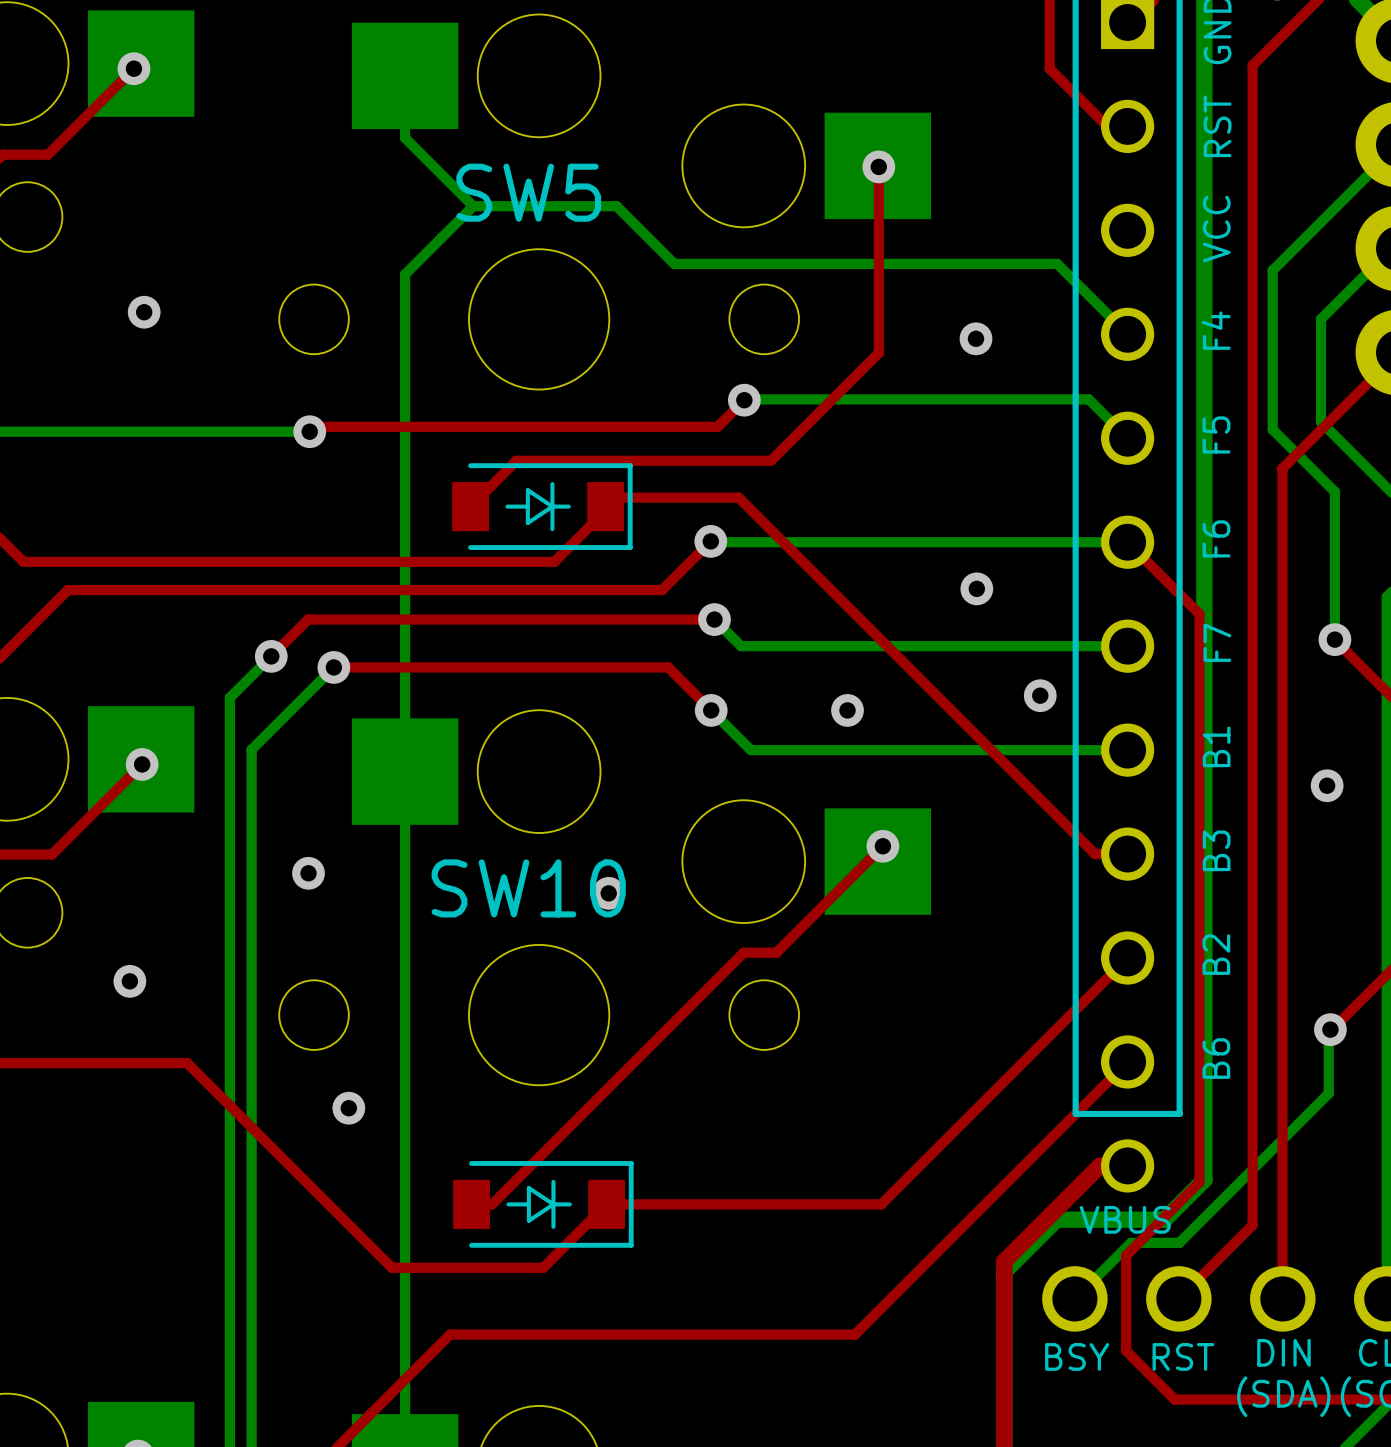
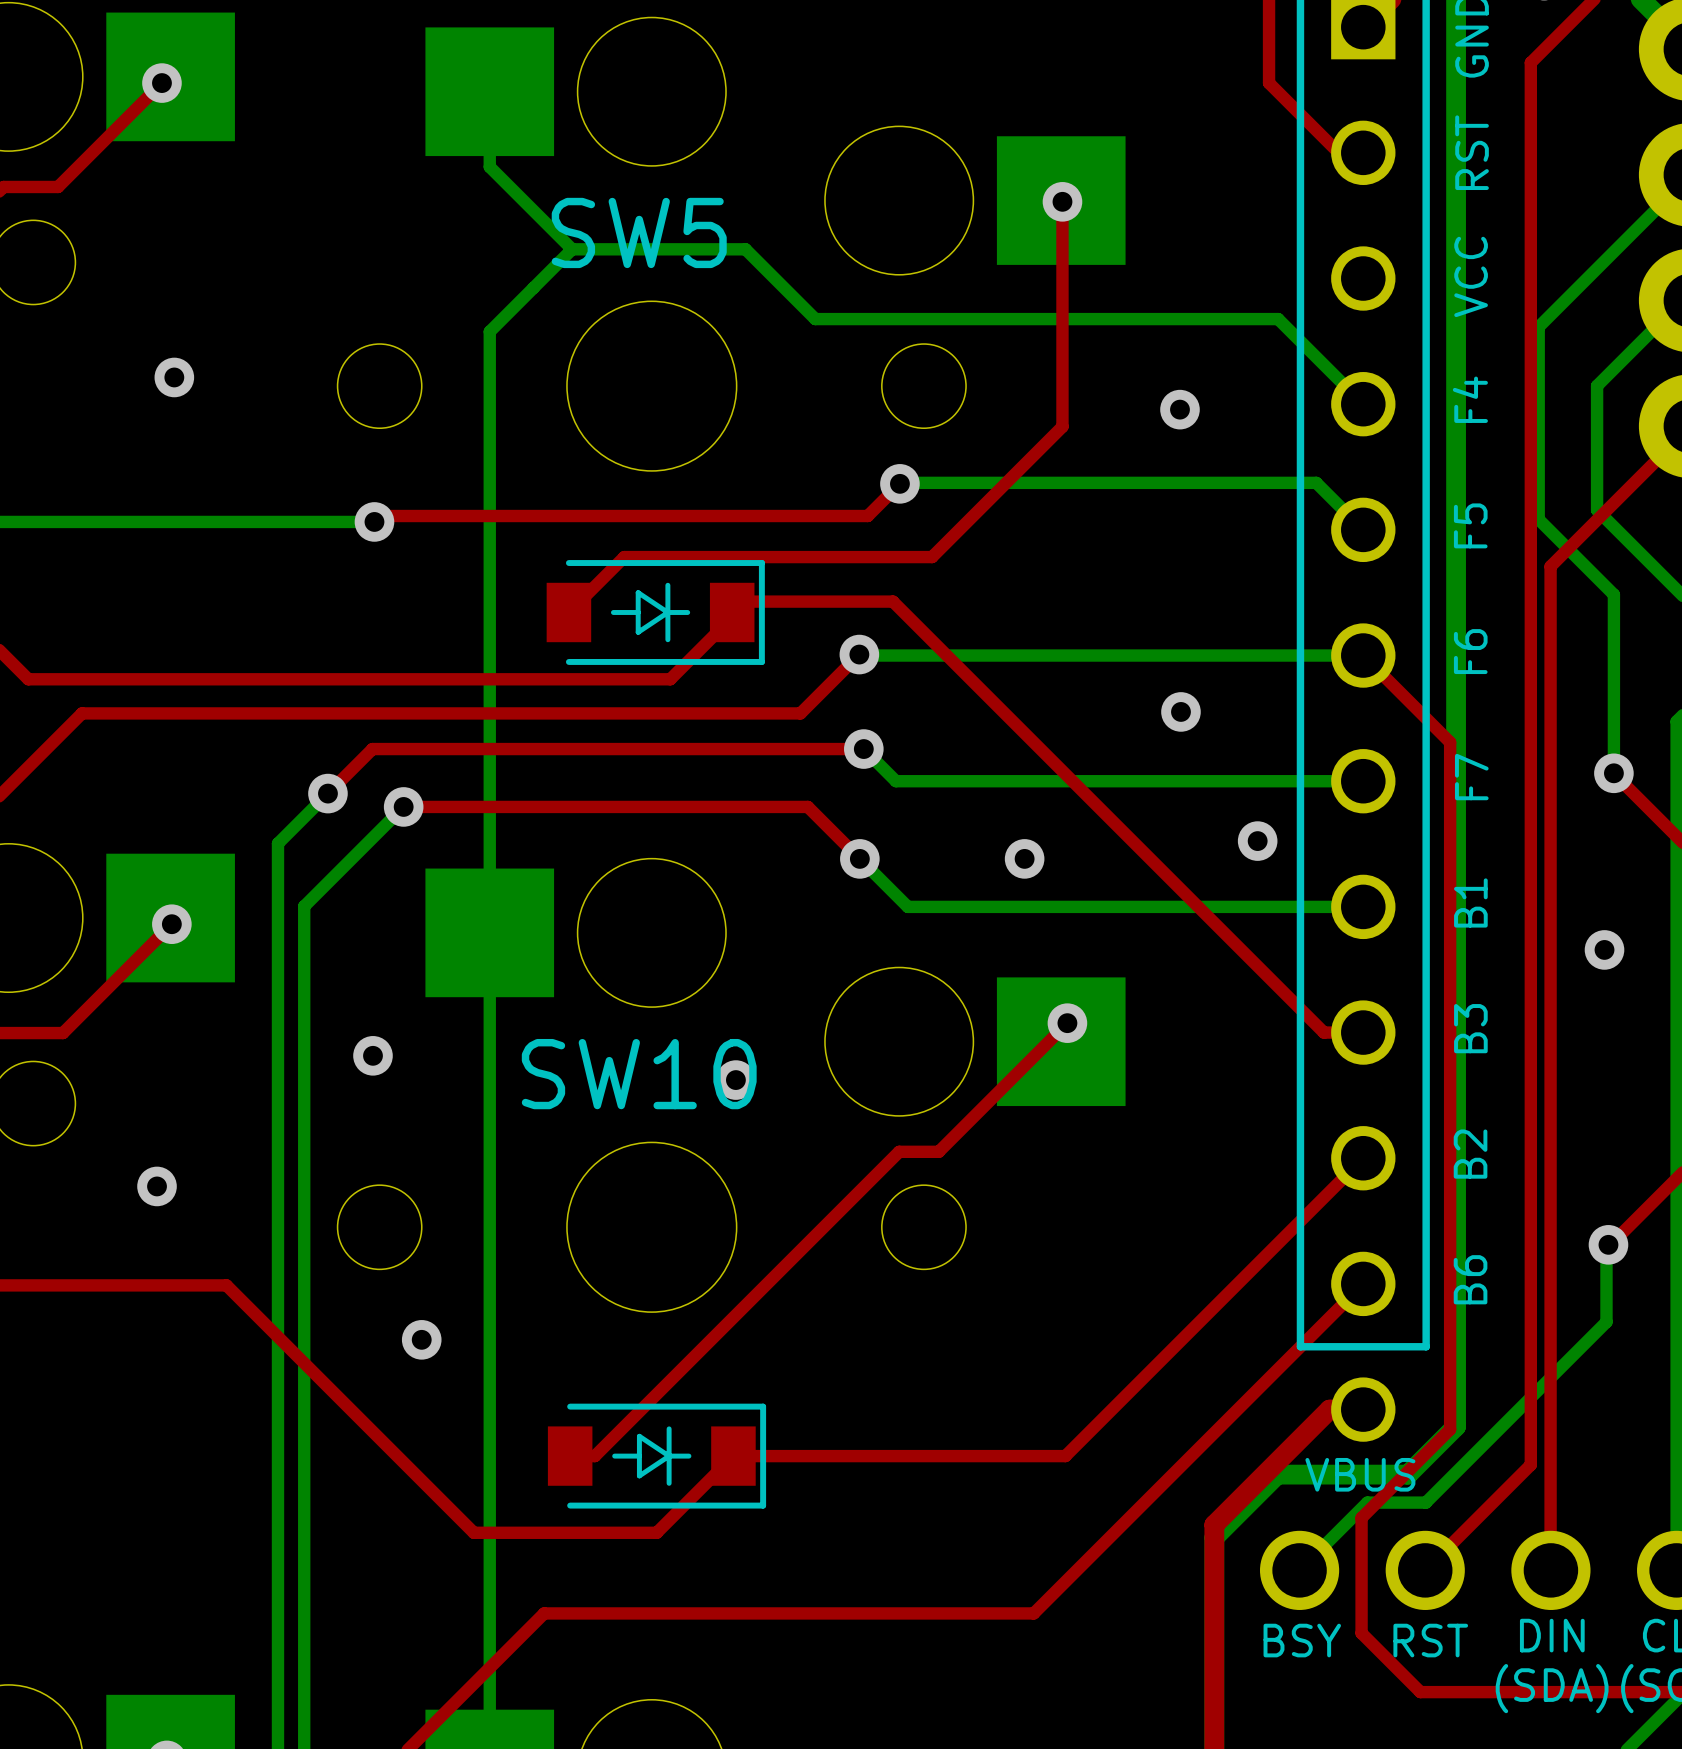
top track: (1266, 51) (1252, 65) (1252, 1225) -> (1530, 62) (1530, 1464) (1514, 1481)

